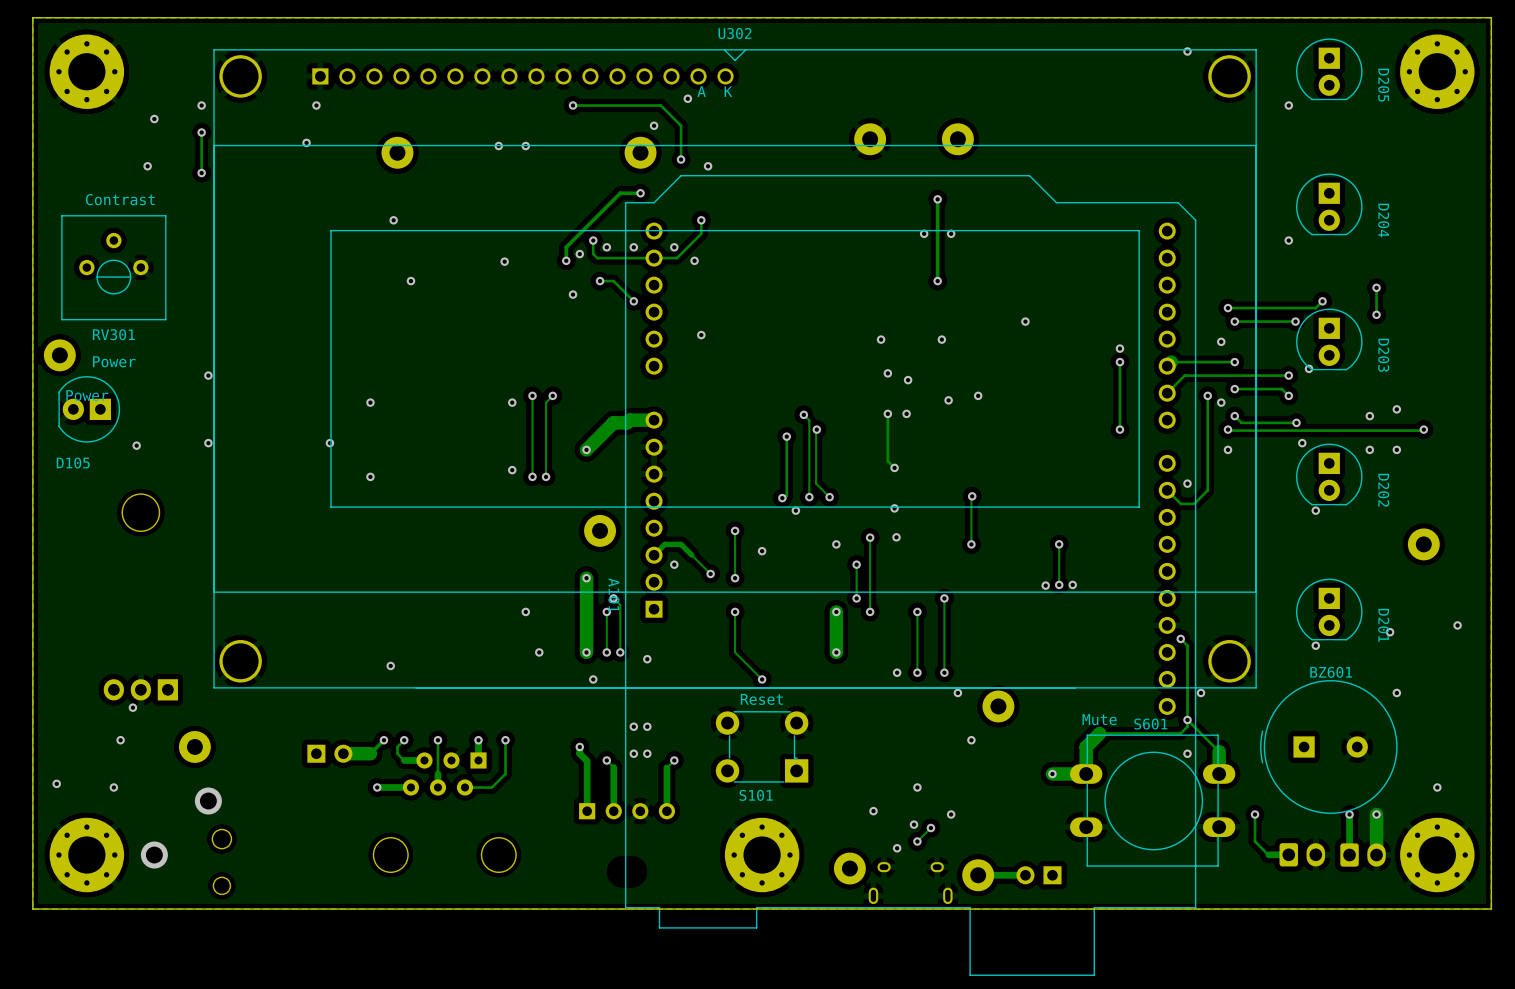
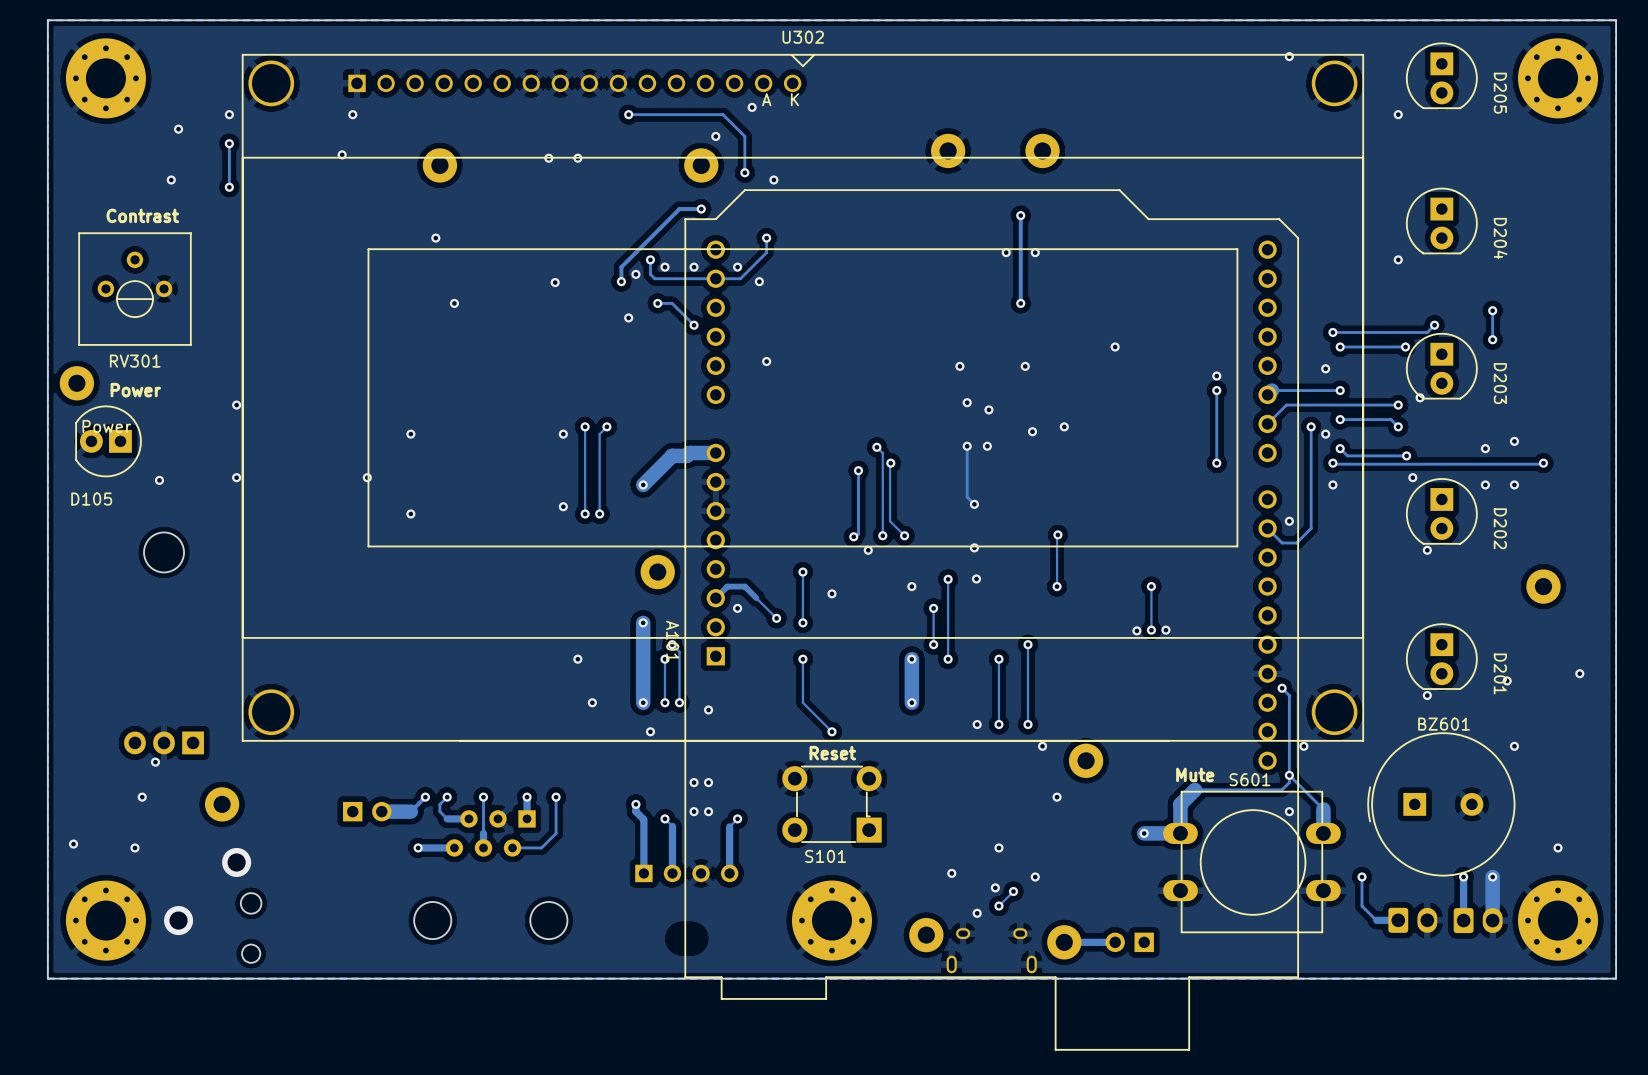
via: (390, 665) -> none

